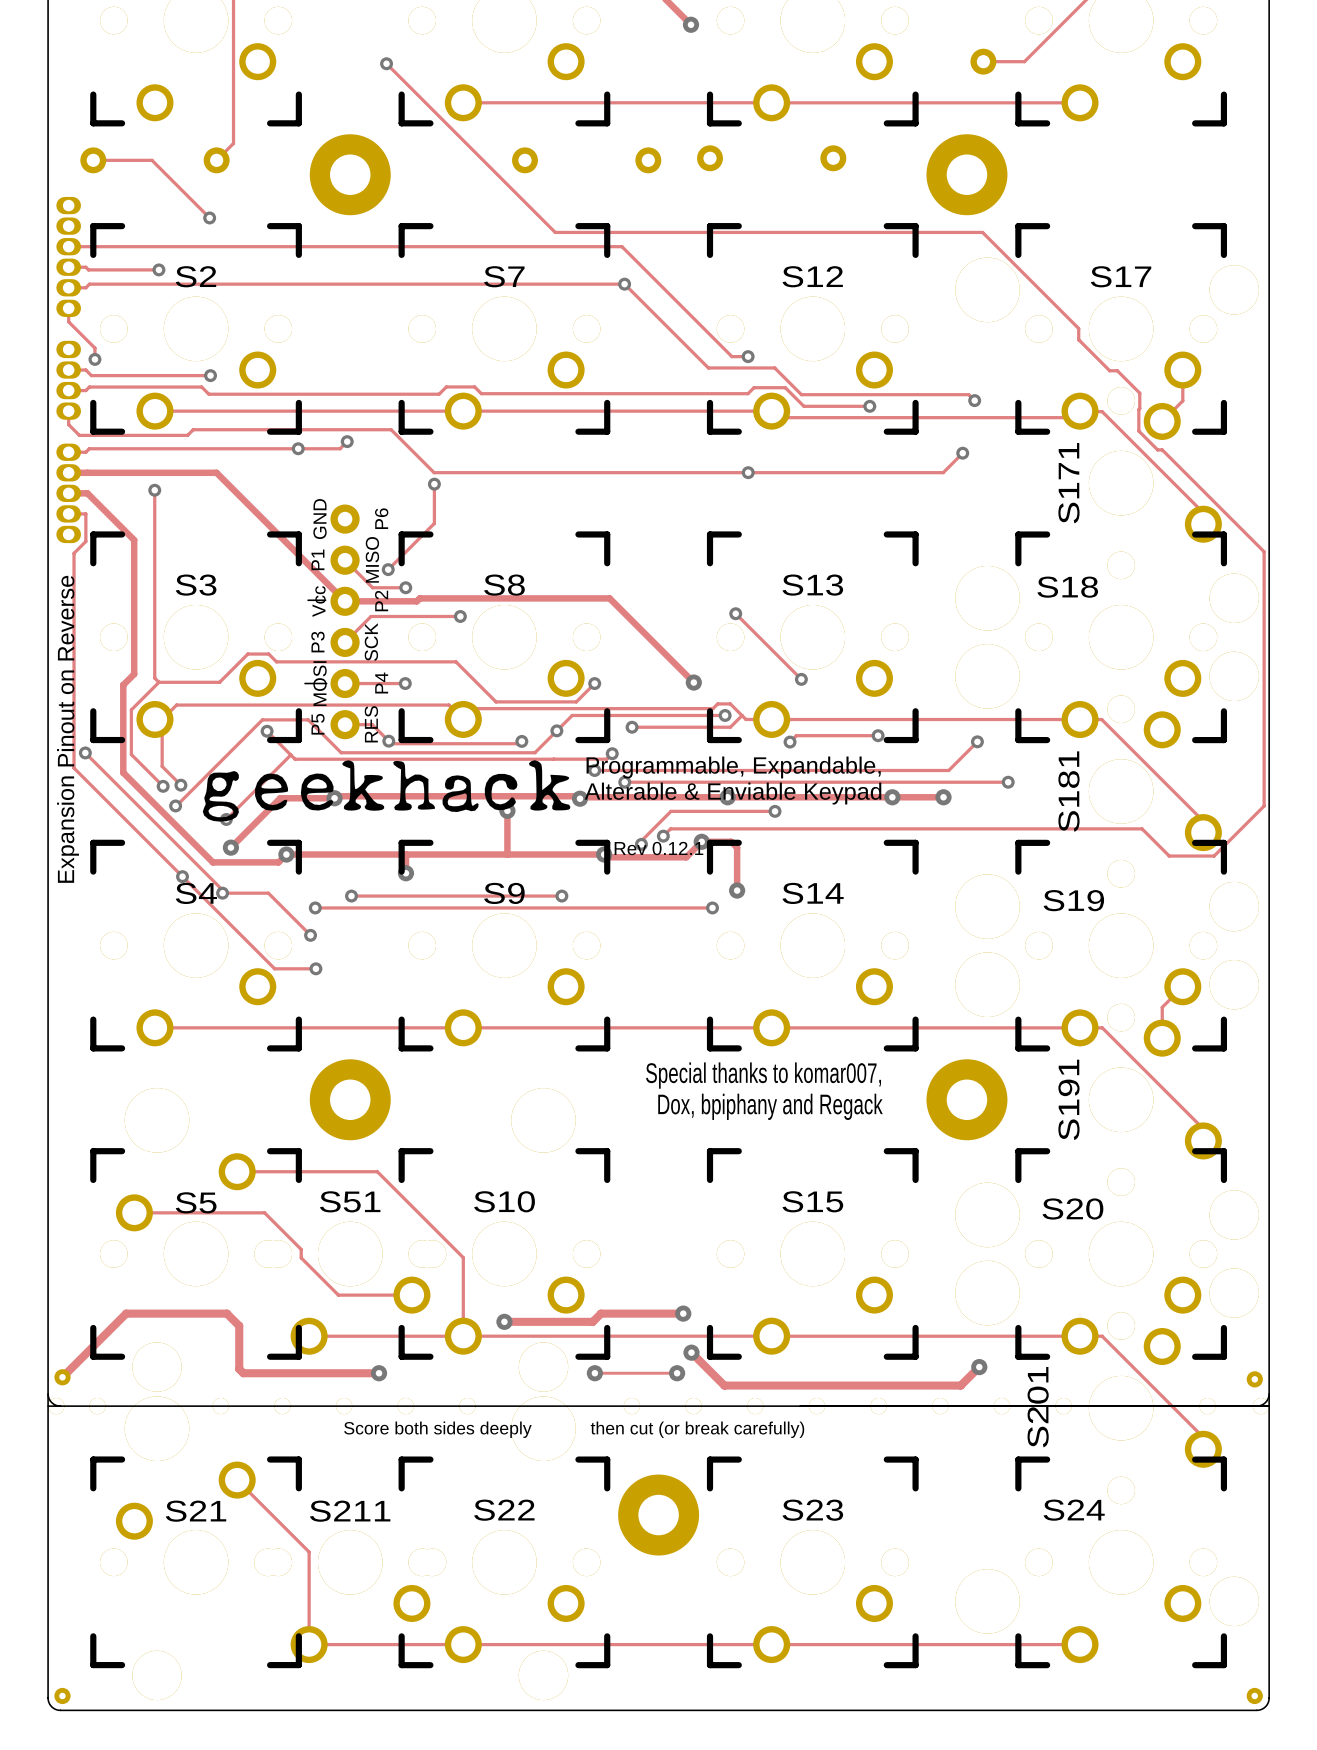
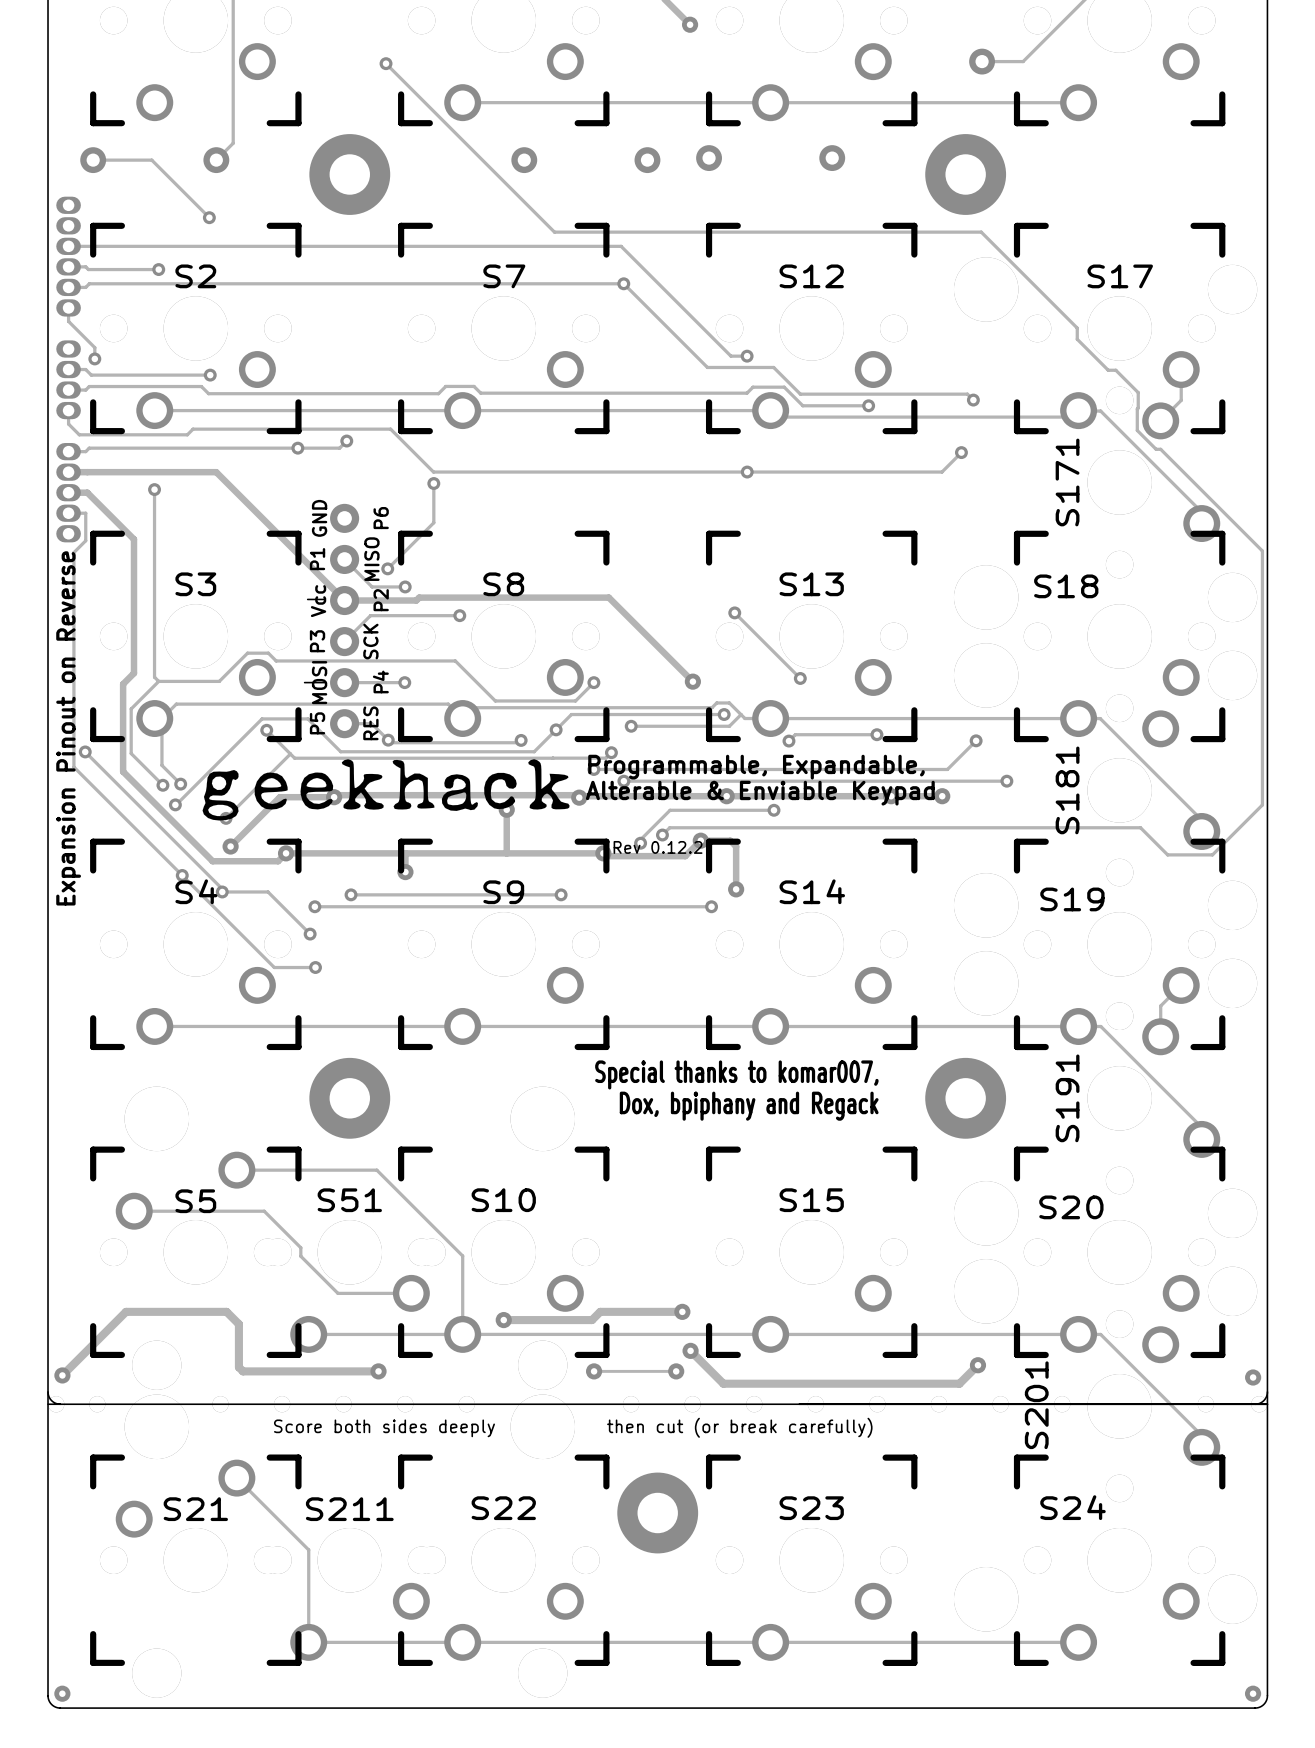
text: Rev 0.12.1 (658, 848) -> Rev 0.12.2 (658, 847)

